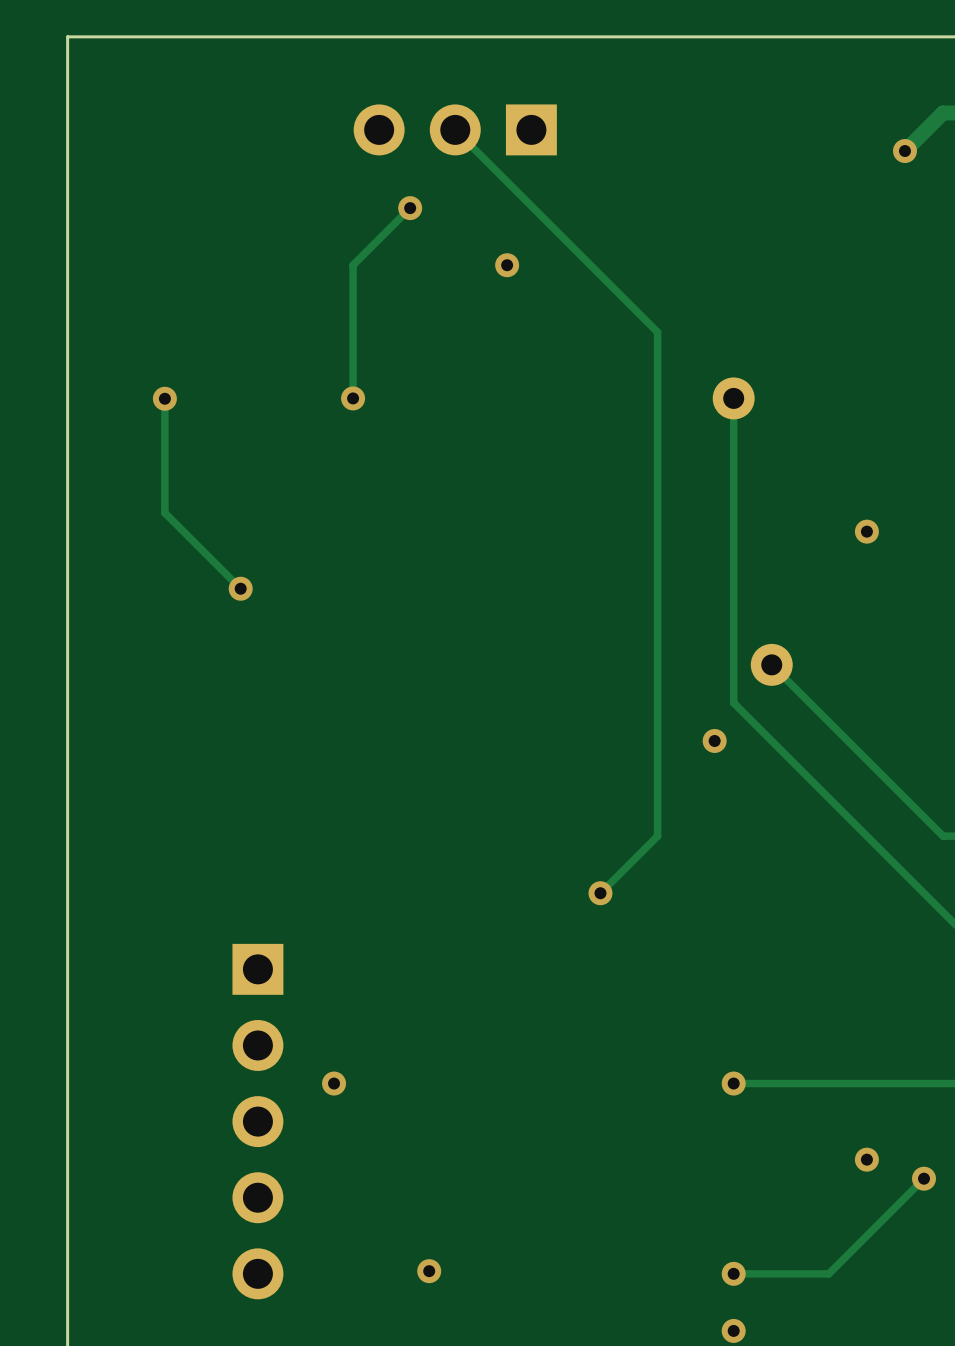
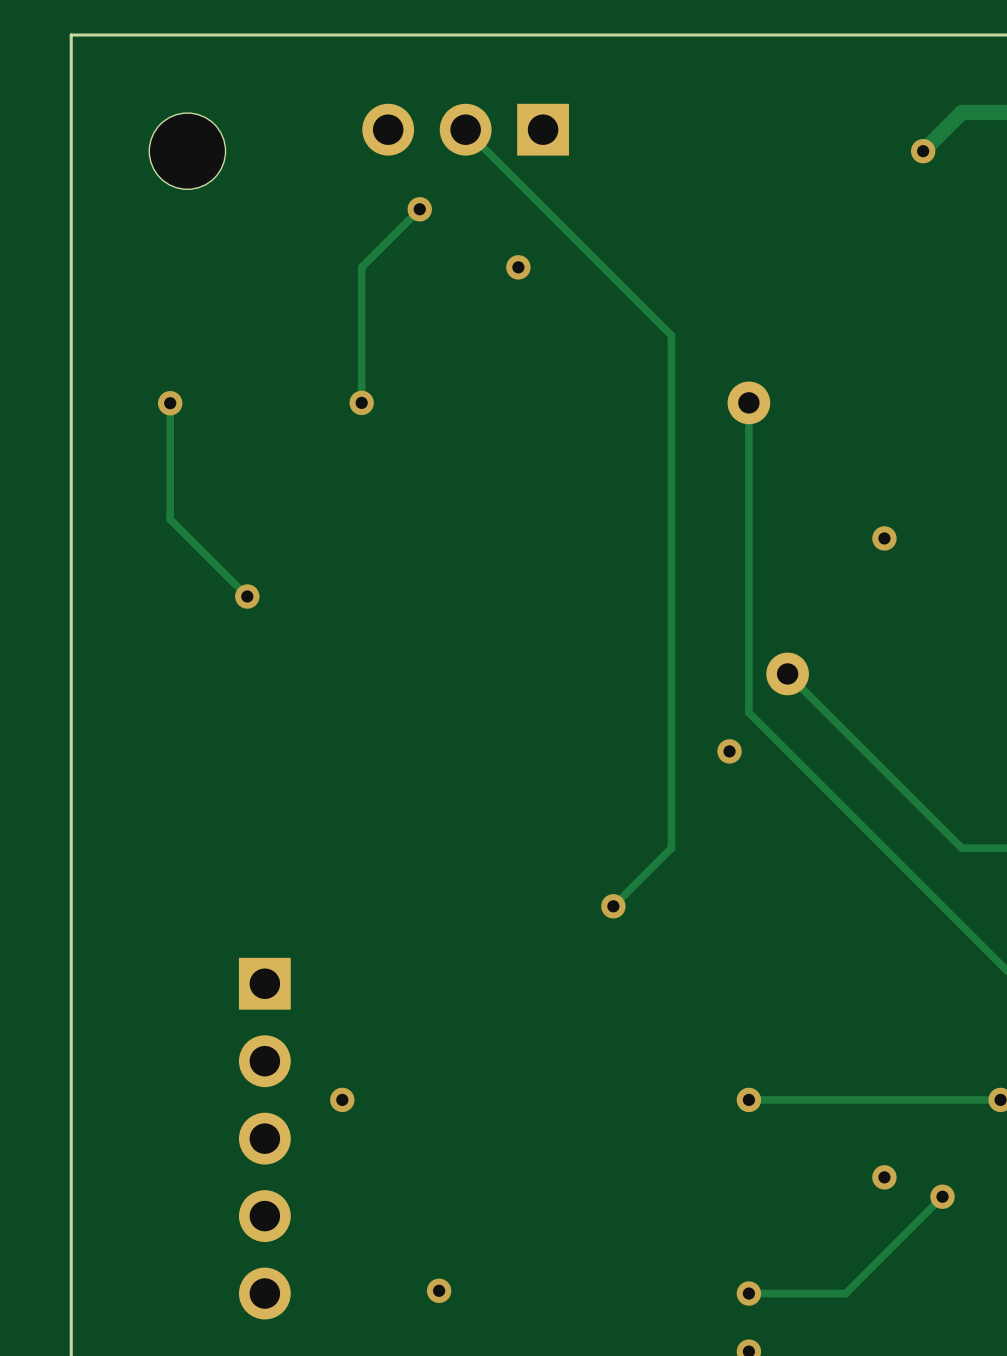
part: none -> (187, 151)

